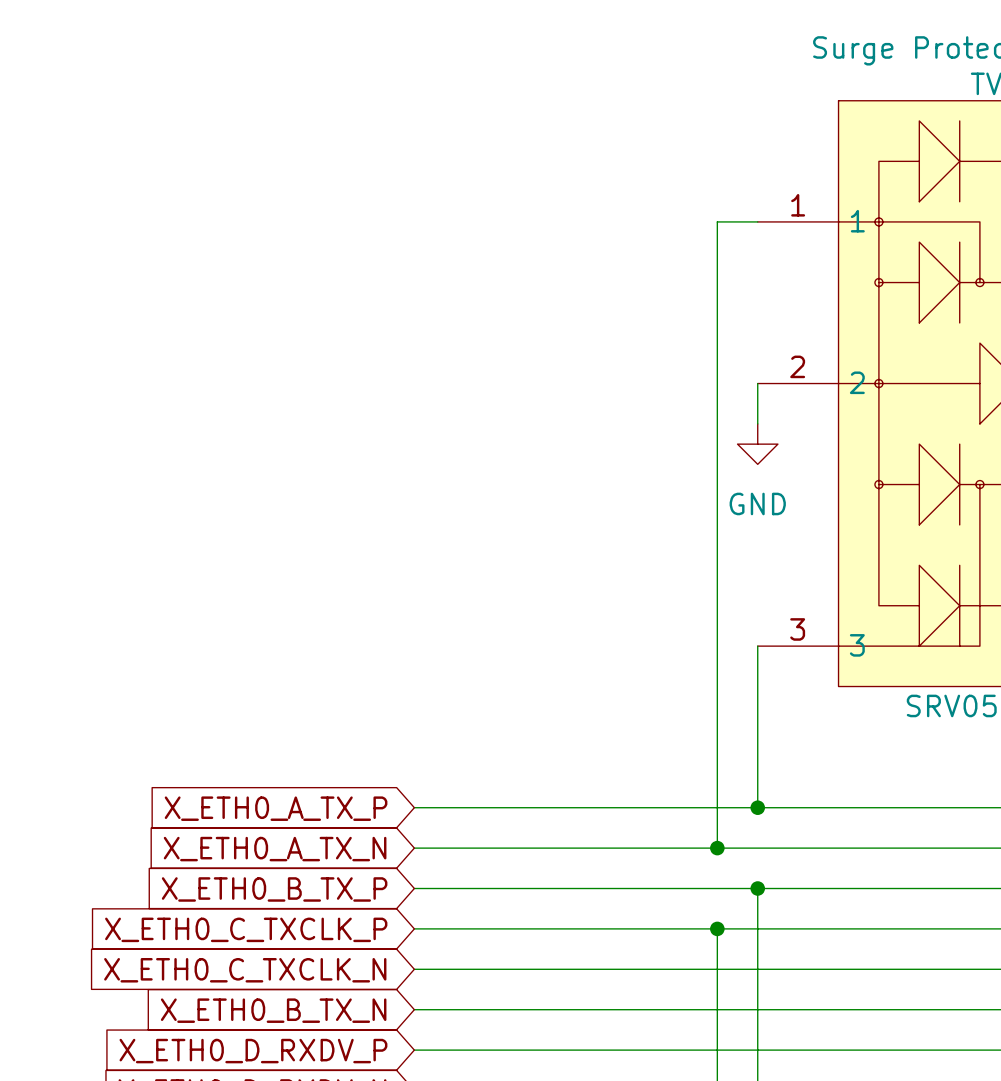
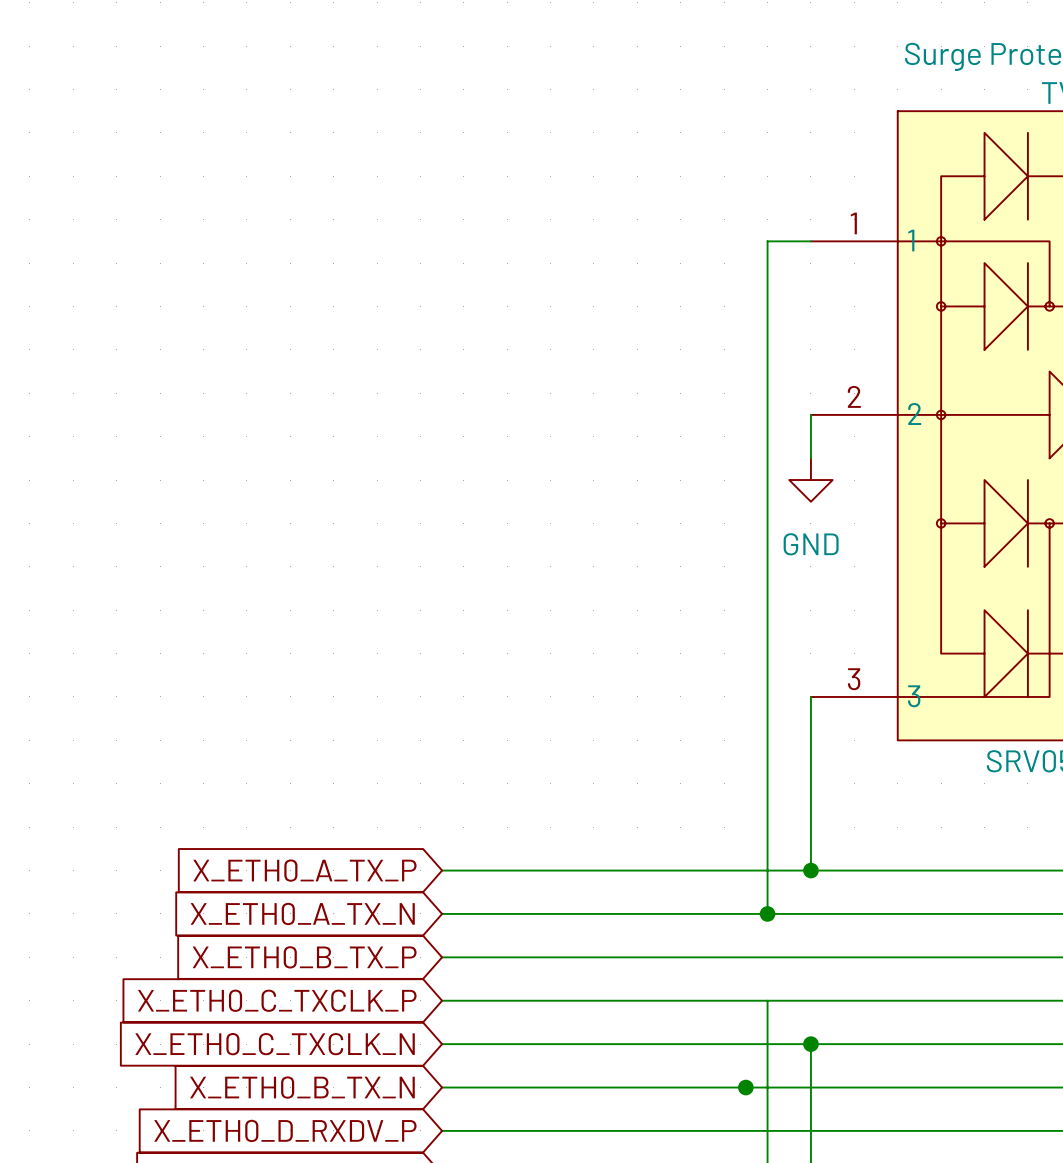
wire: (757, 888) (757, 969) -> none
junction: (757, 888) -> none
junction: (717, 928) -> none
junction: none -> (810, 1044)
junction: none -> (745, 1087)

